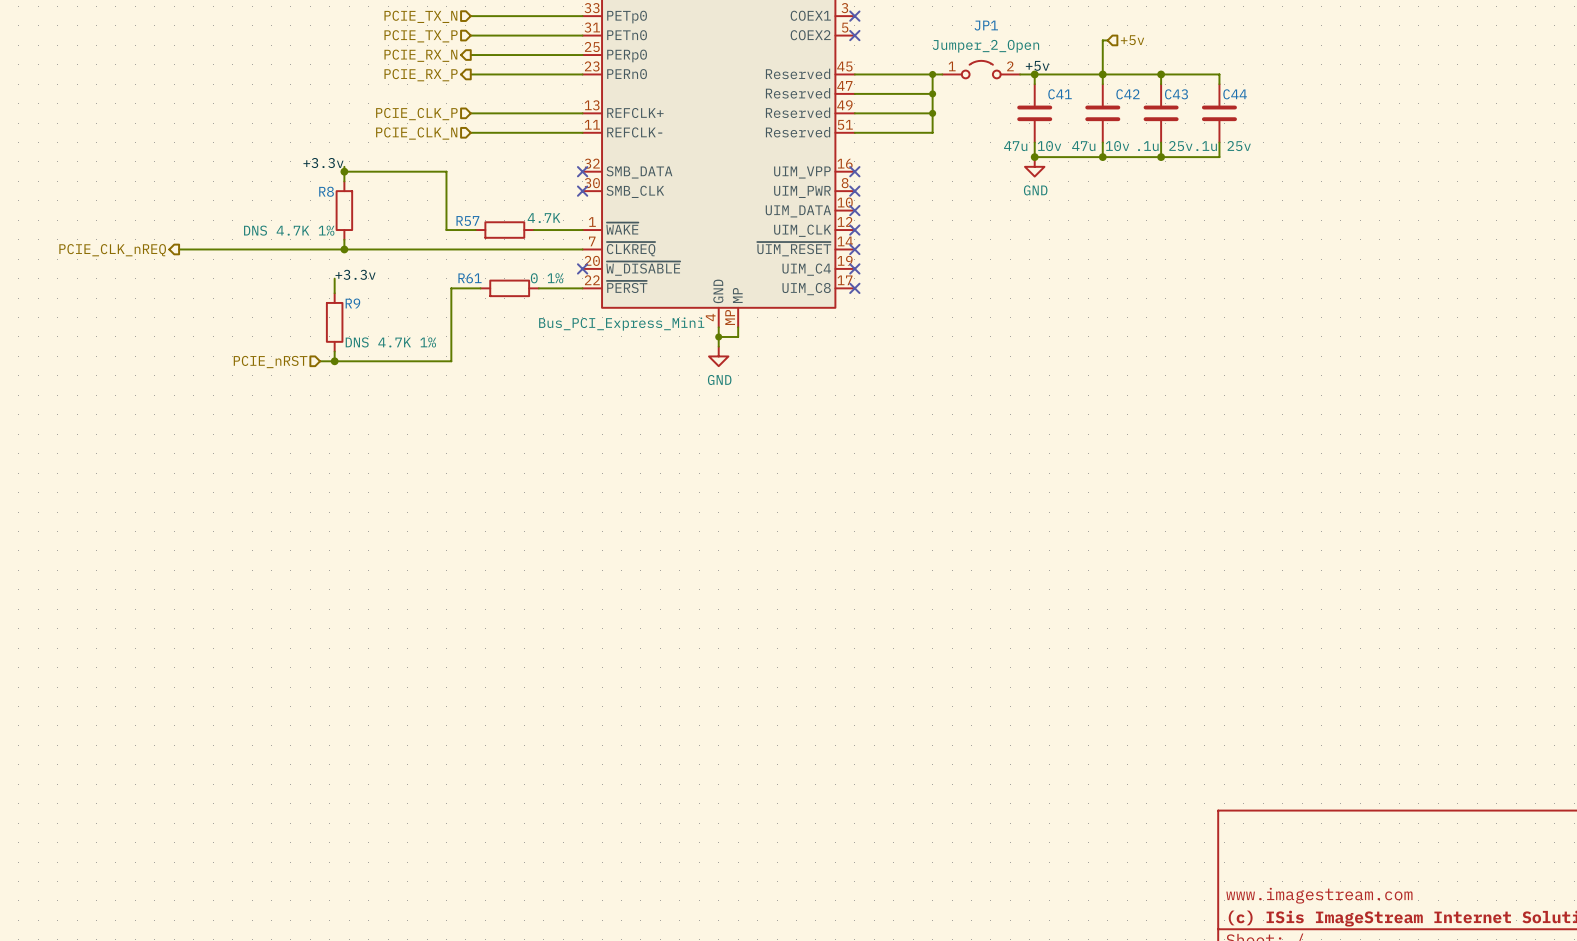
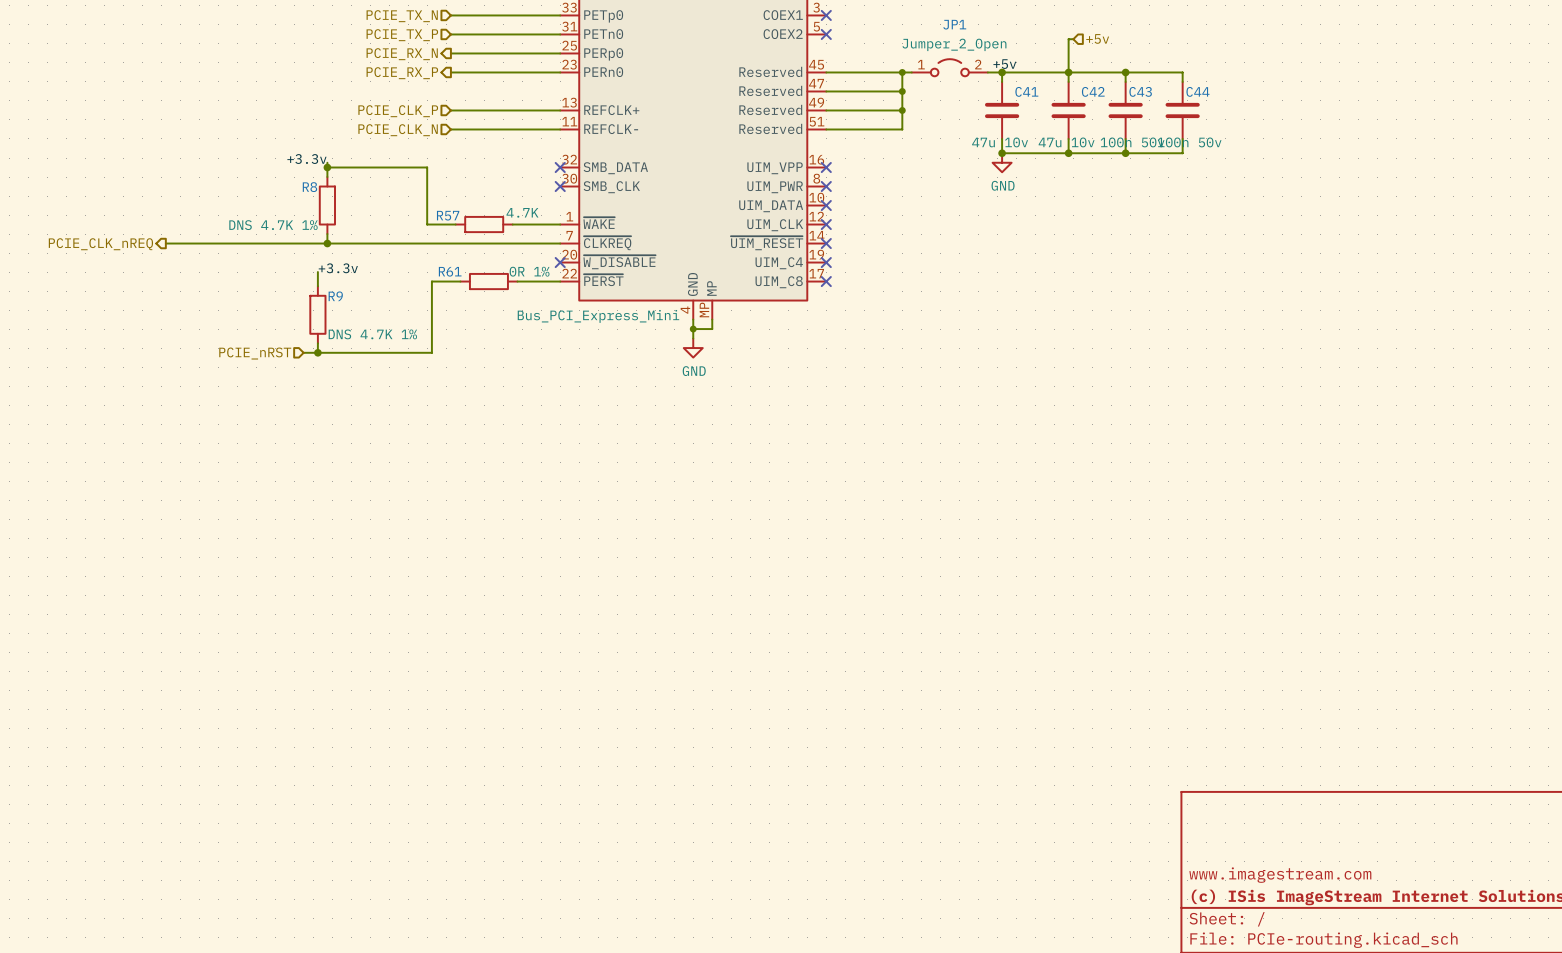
C43 value: .1u 25v (1165, 146) -> 100n 50v (1132, 142)
C44 value: .1u 25v (1223, 146) -> 100n 50v (1189, 142)
R61 value: 0 1% (547, 278) -> 0R 1% (529, 271)

